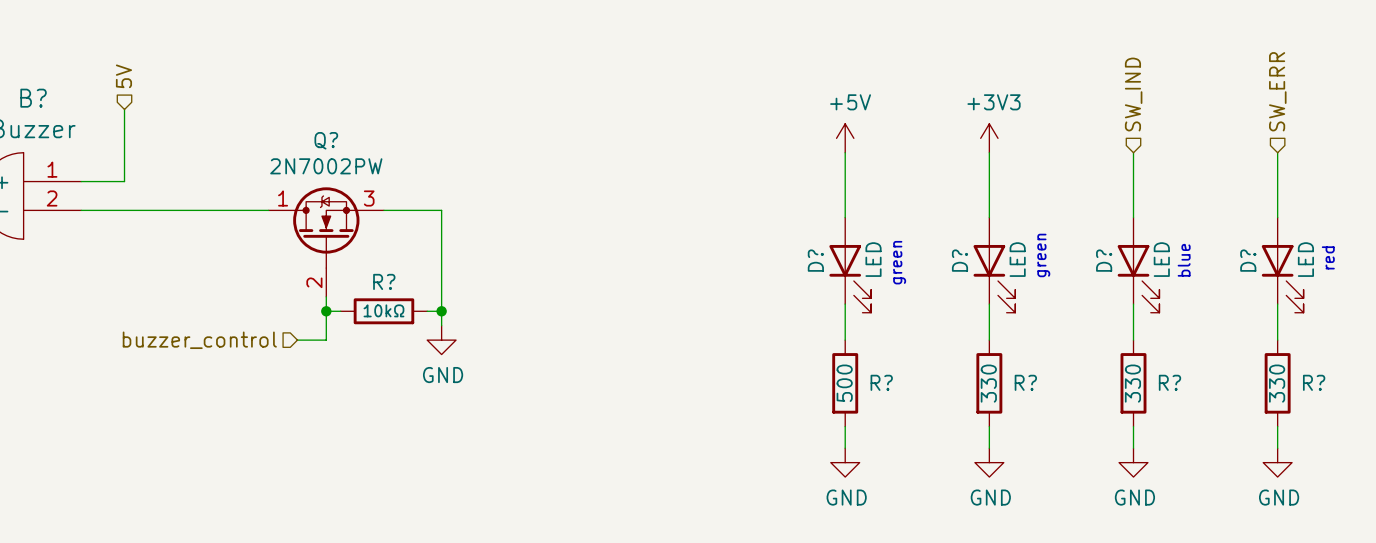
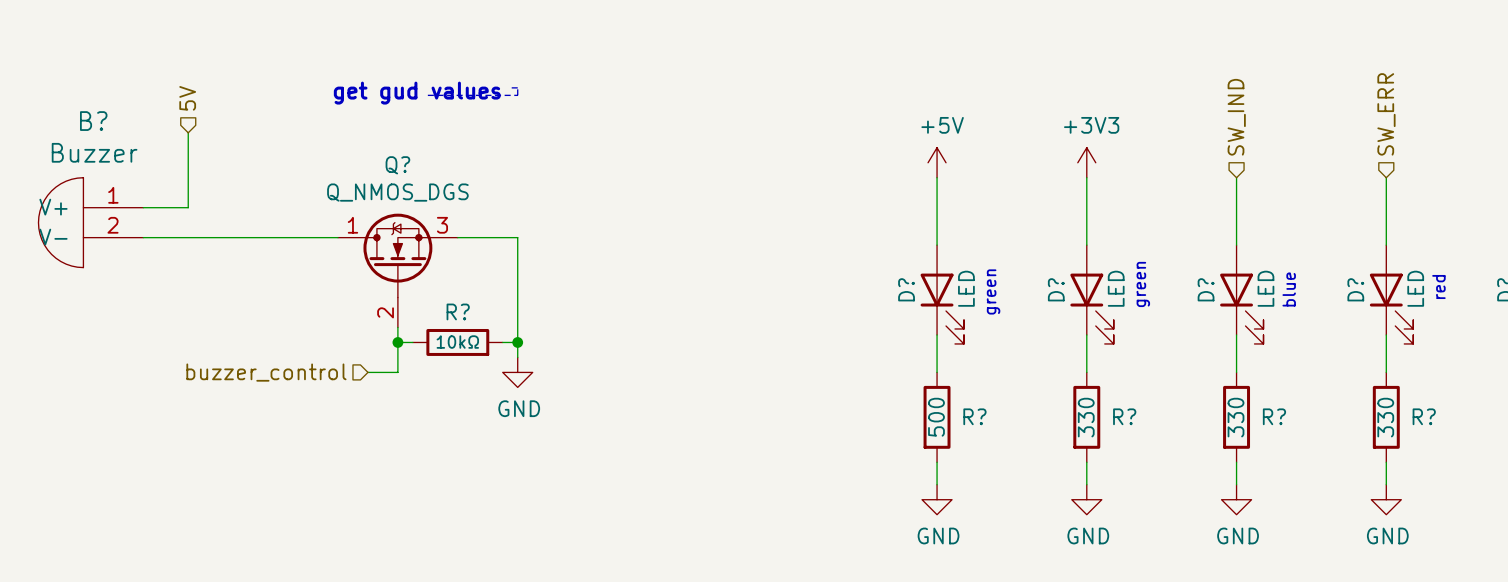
line: none -> (510, 87) (517, 87) (517, 95) (427, 95)
text: none -> get gud values (417, 93)
Q? value: 2N7002PW (326, 166) -> Q_NMOS_DGS (397, 192)

